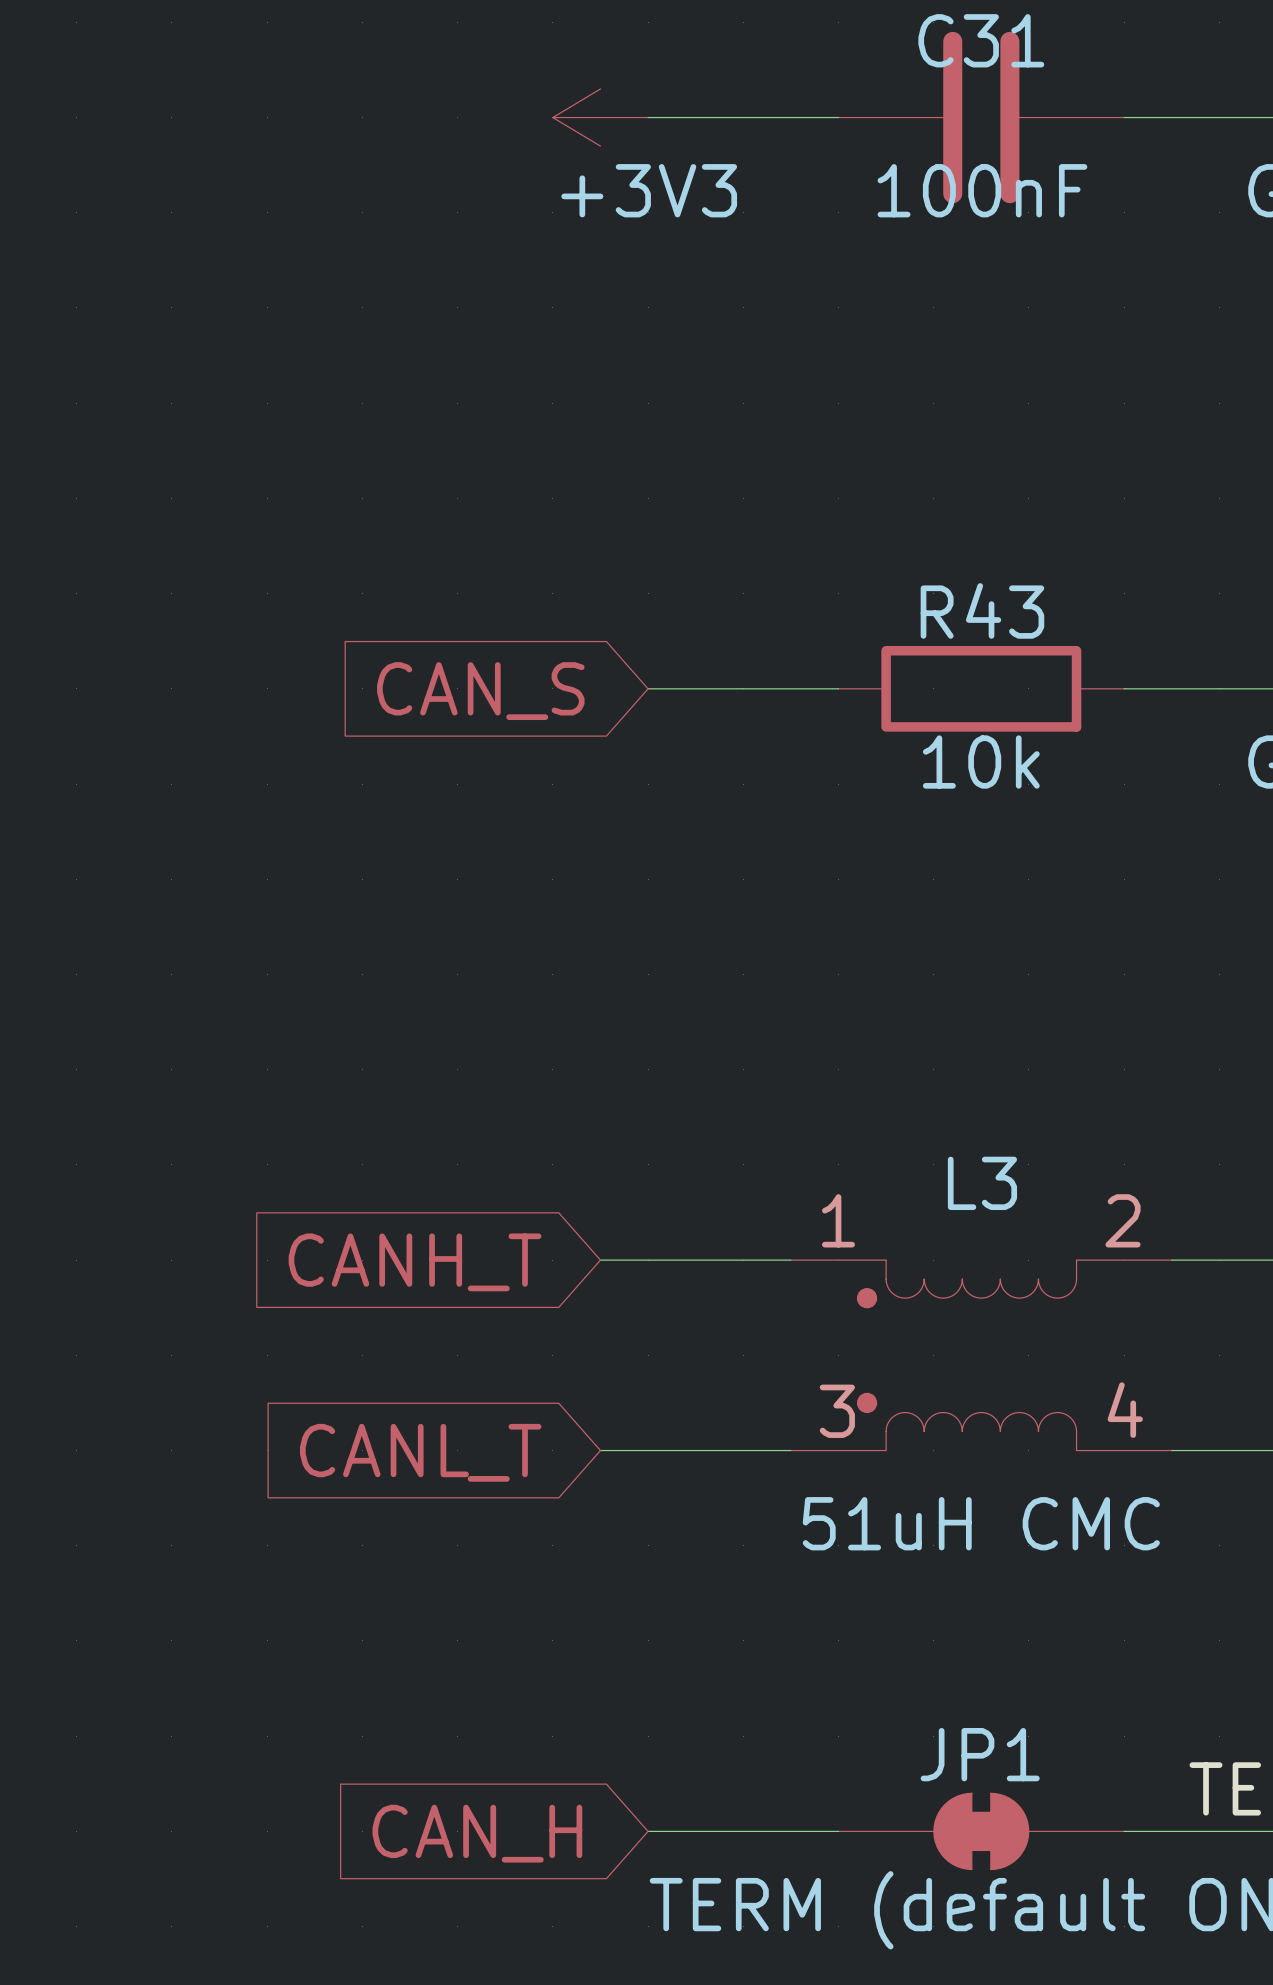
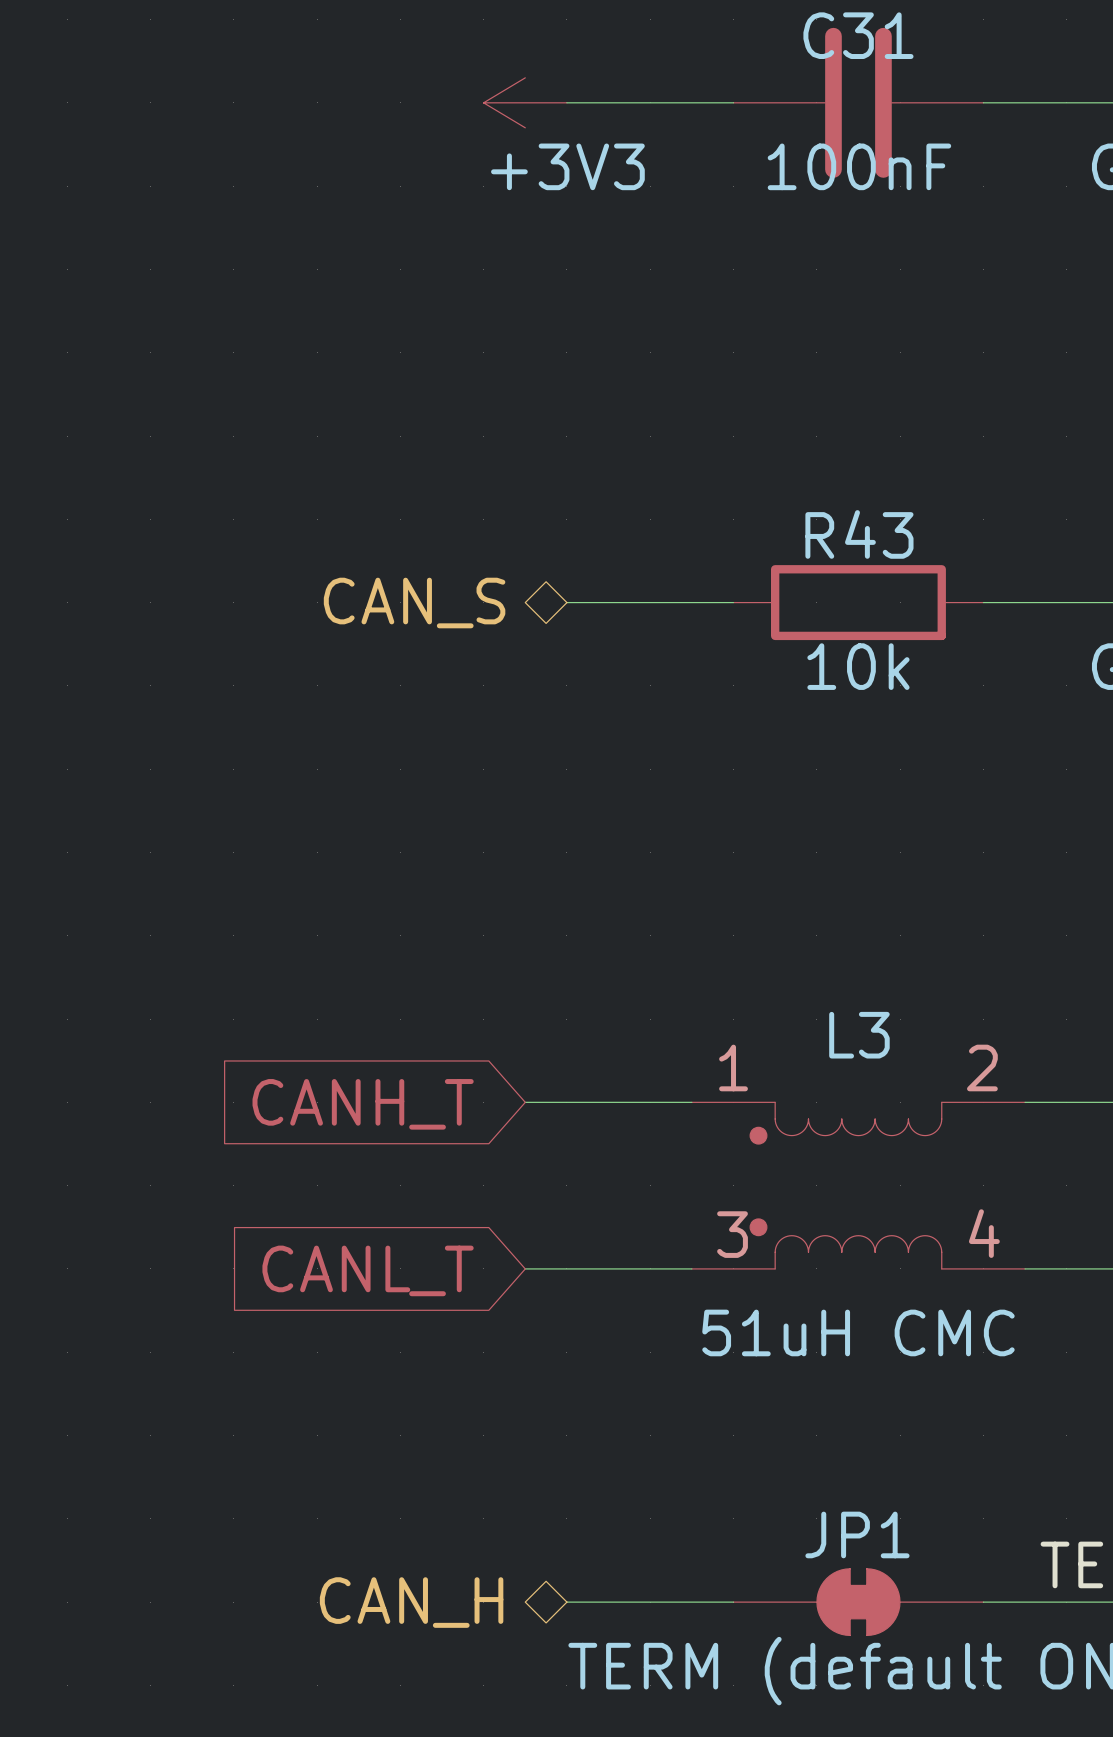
hierarchical label: none -> CAN_S (414, 603)
global label: CAN_S (480, 691) -> none
hierarchical label: none -> CAN_H (411, 1602)
global label: CAN_H (477, 1833) -> none

